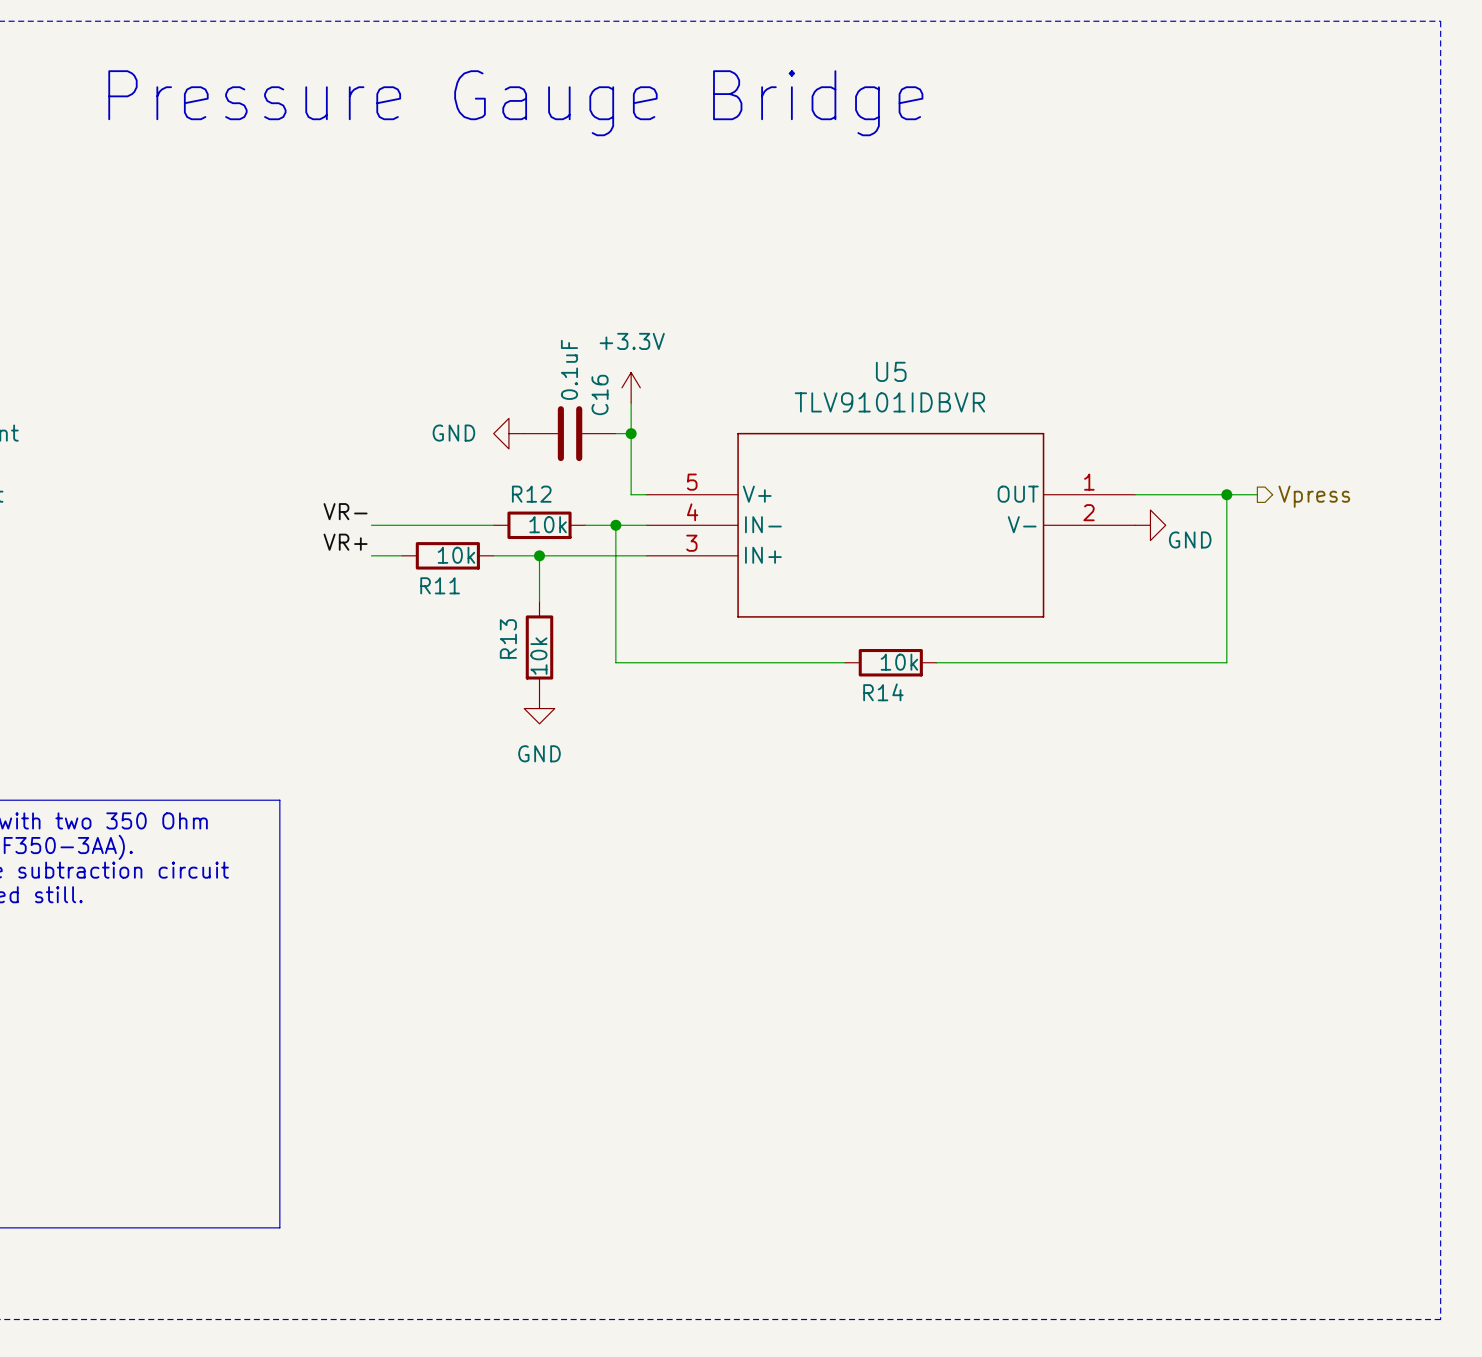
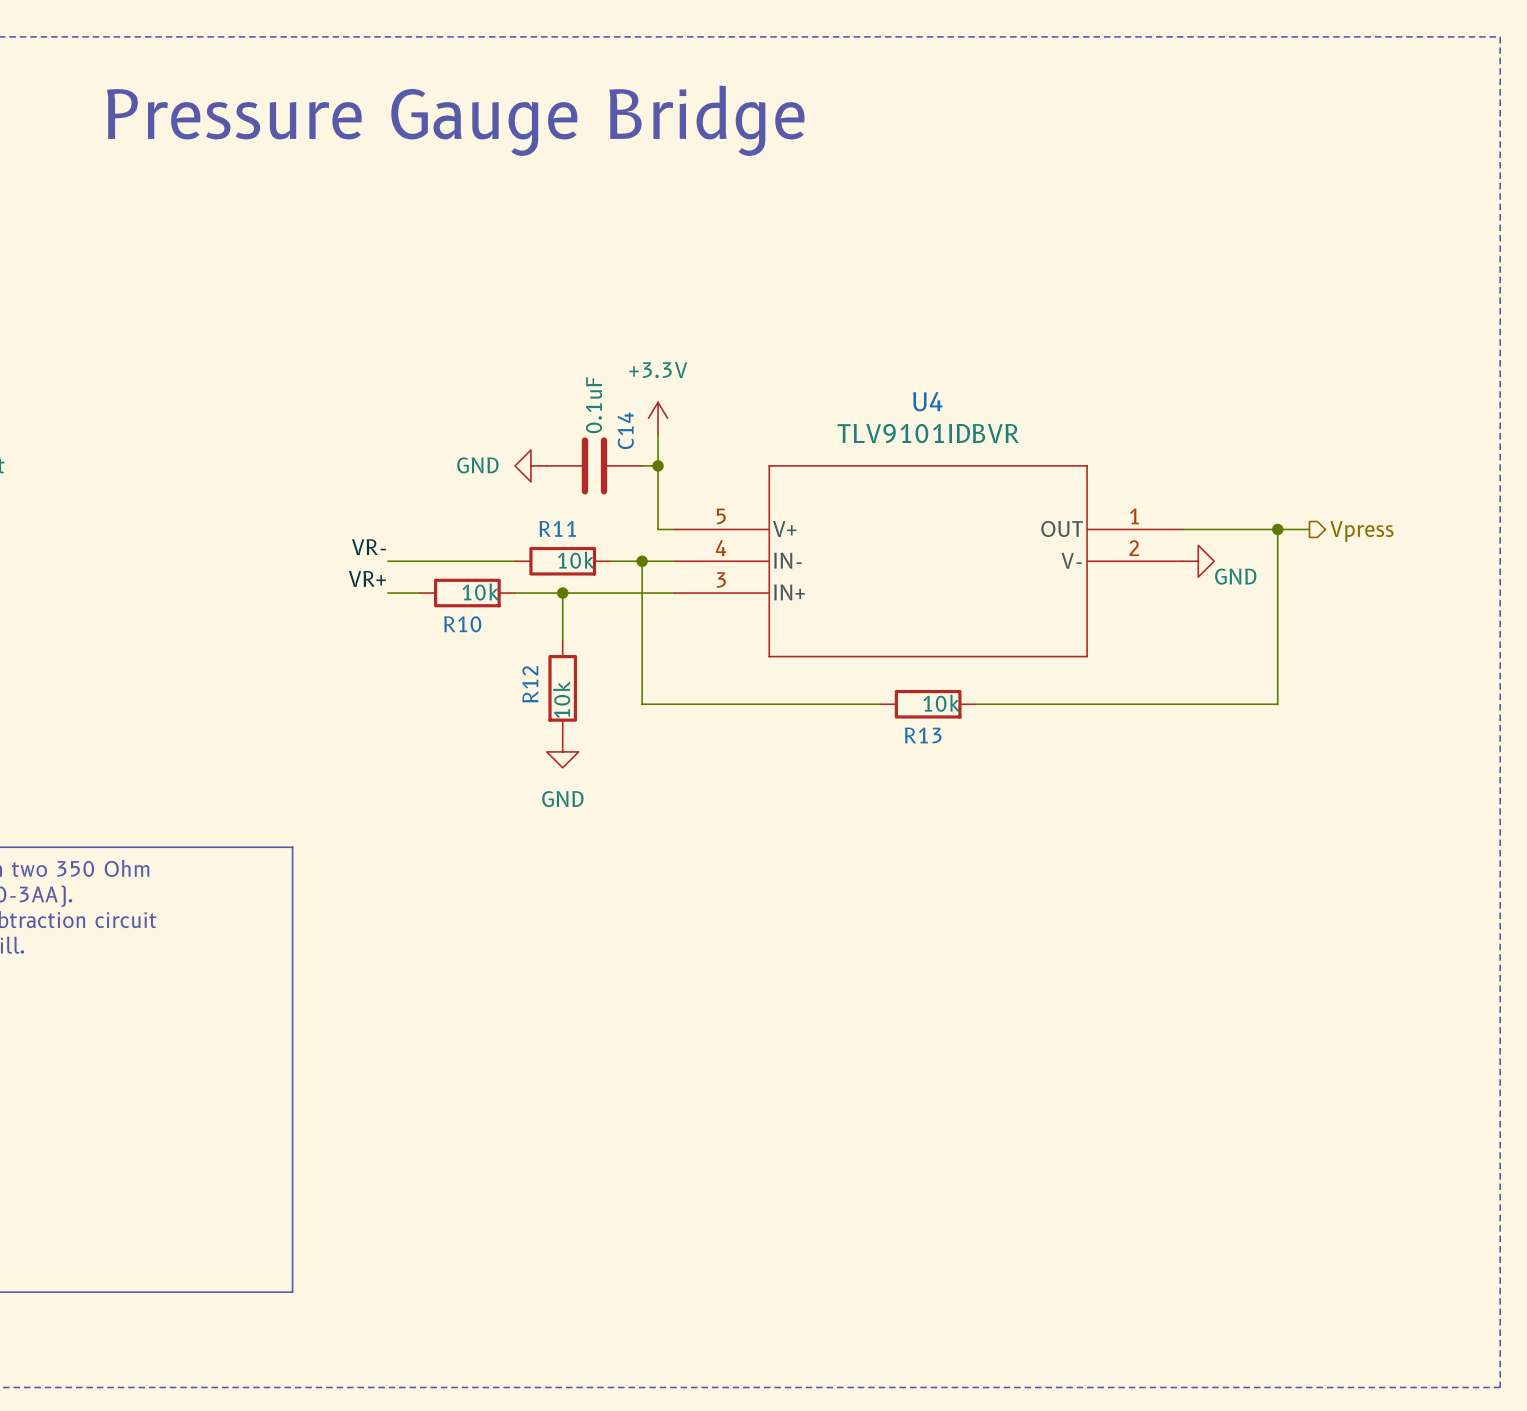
U5 name: U5 (891, 371) -> U4 (927, 401)
C16 name: C16 (600, 394) -> C14 (625, 430)
R12 name: R12 (531, 494) -> R11 (557, 528)
R11 name: R11 (440, 585) -> R10 (462, 624)
R13 name: R13 (508, 638) -> R12 (530, 684)
R14 name: R14 (883, 692) -> R13 (923, 735)

